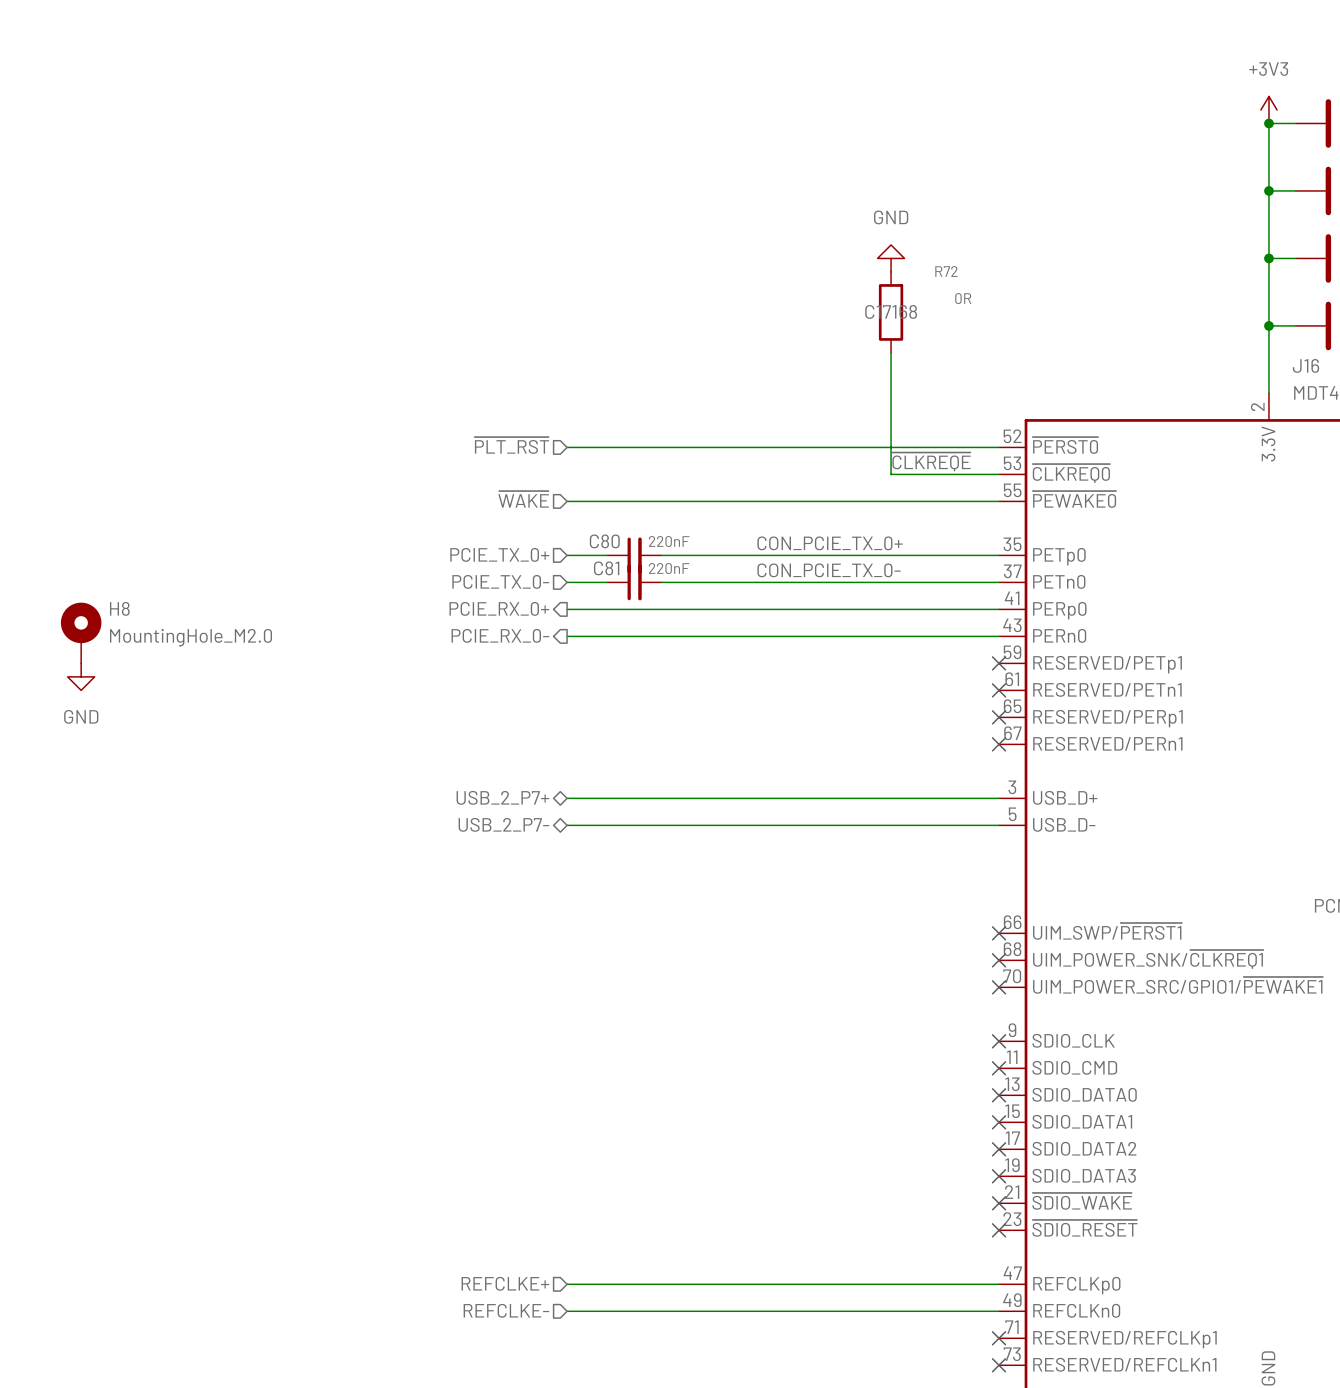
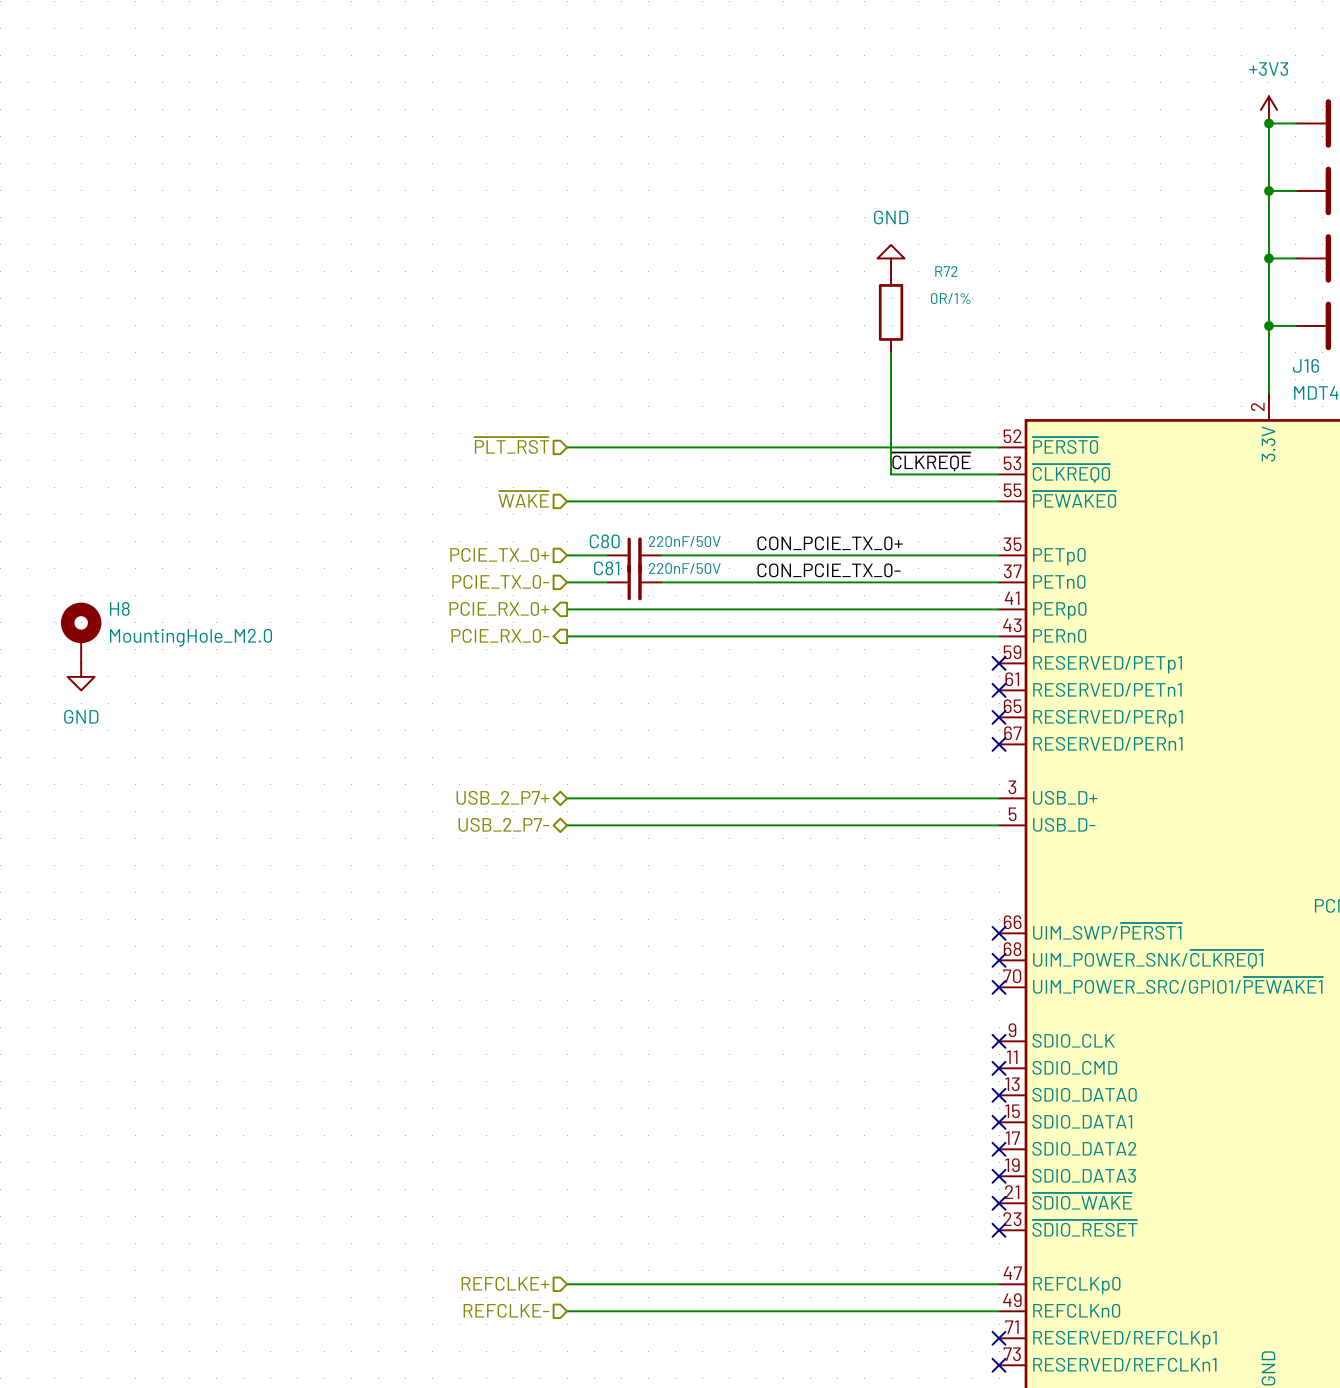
R72 value: 0R (963, 298) -> 0R/1% (950, 298)
R72 text: C17168 (891, 311) -> none
C80 value: 220nF (669, 541) -> 220nF/50V (684, 541)
C81 value: 220nF (669, 568) -> 220nF/50V (684, 568)

